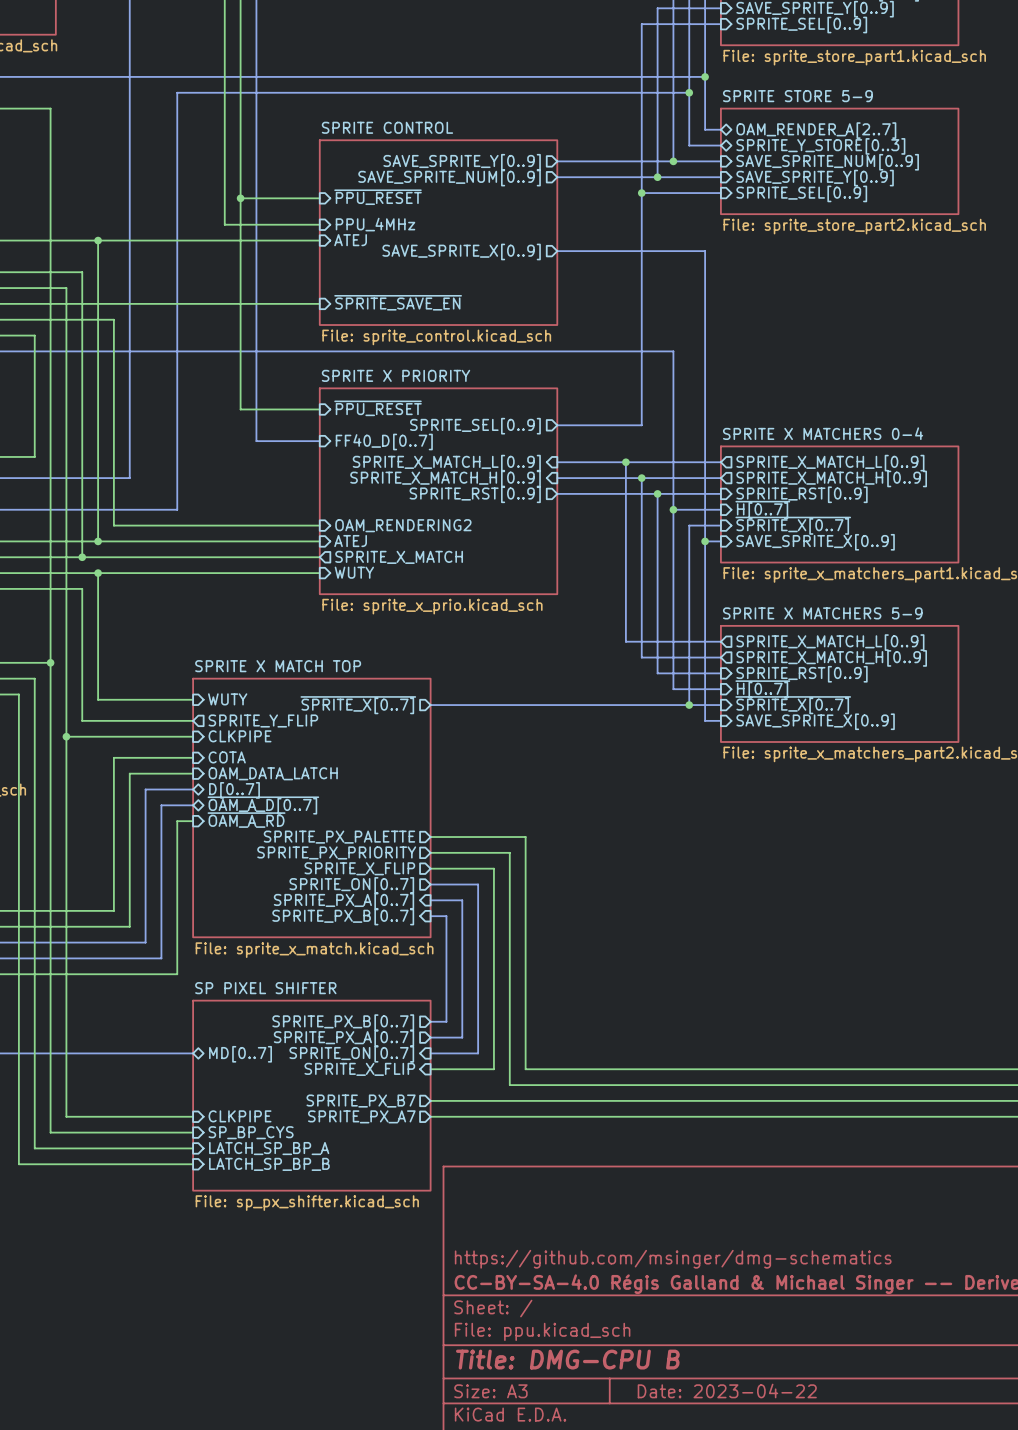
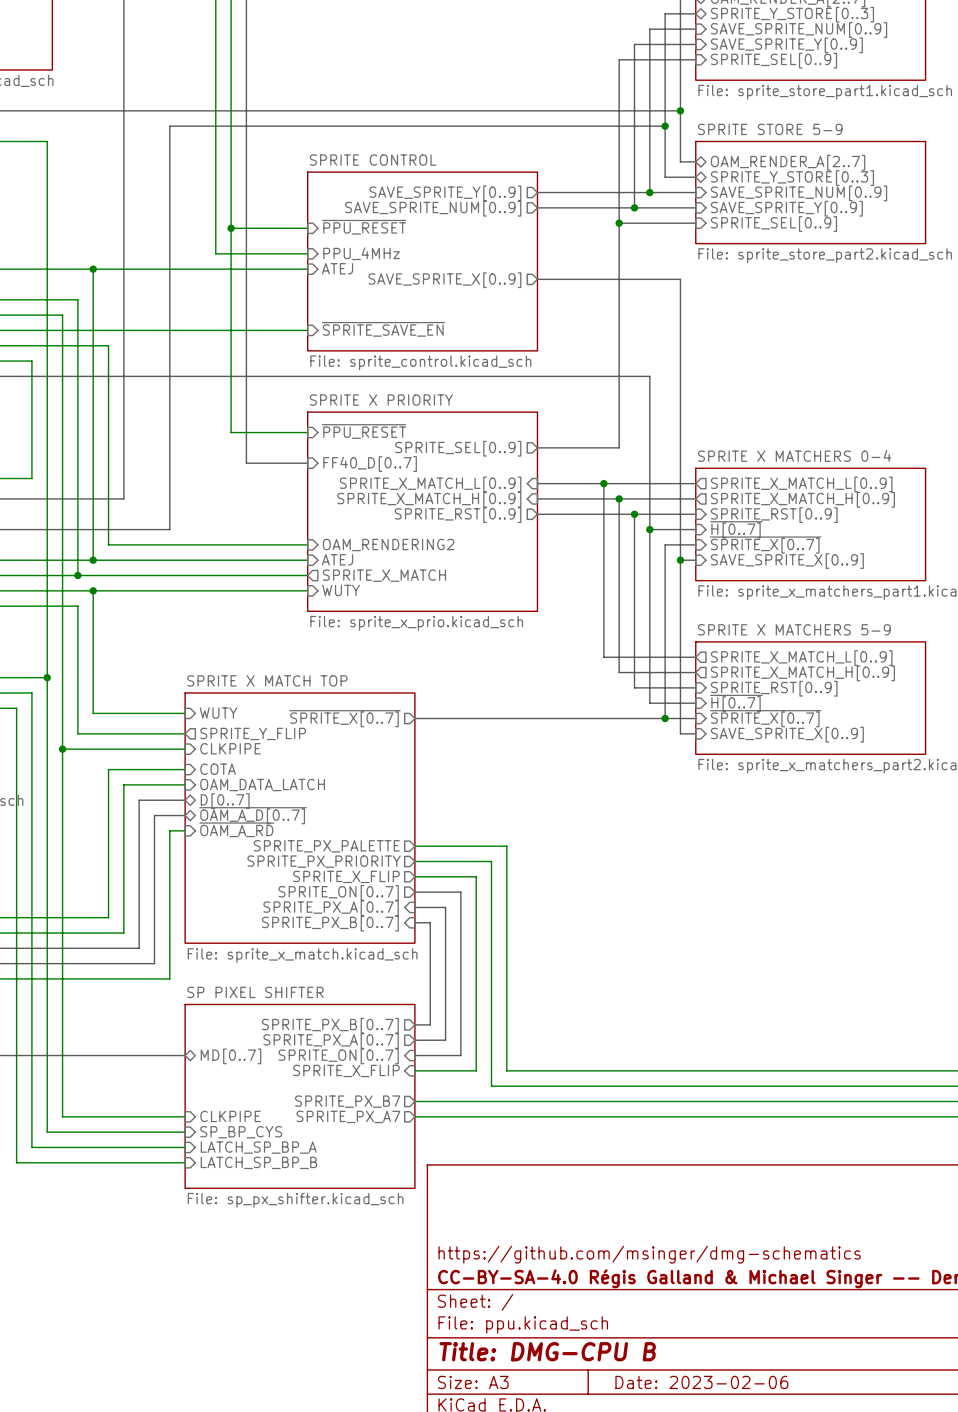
title block: Date: 2023-04-22 (727, 1391) -> Date: 2023-02-06 (701, 1382)

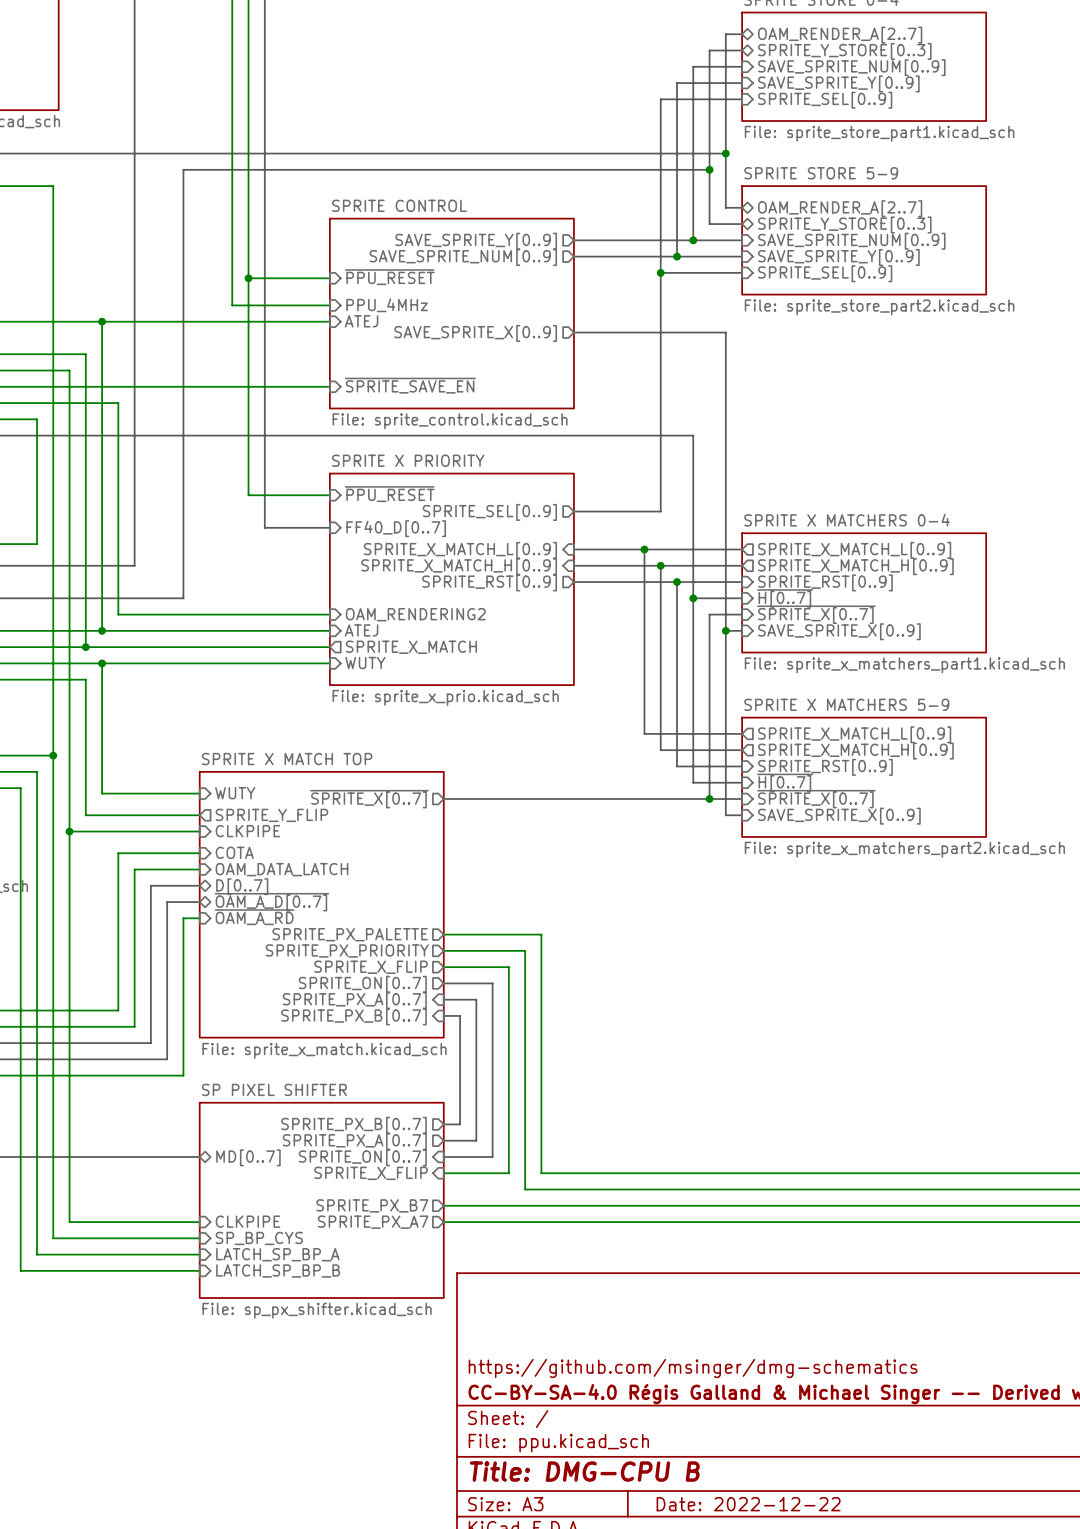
title block: Date: 2023-02-06 (701, 1382) -> Date: 2022-12-22 (748, 1504)

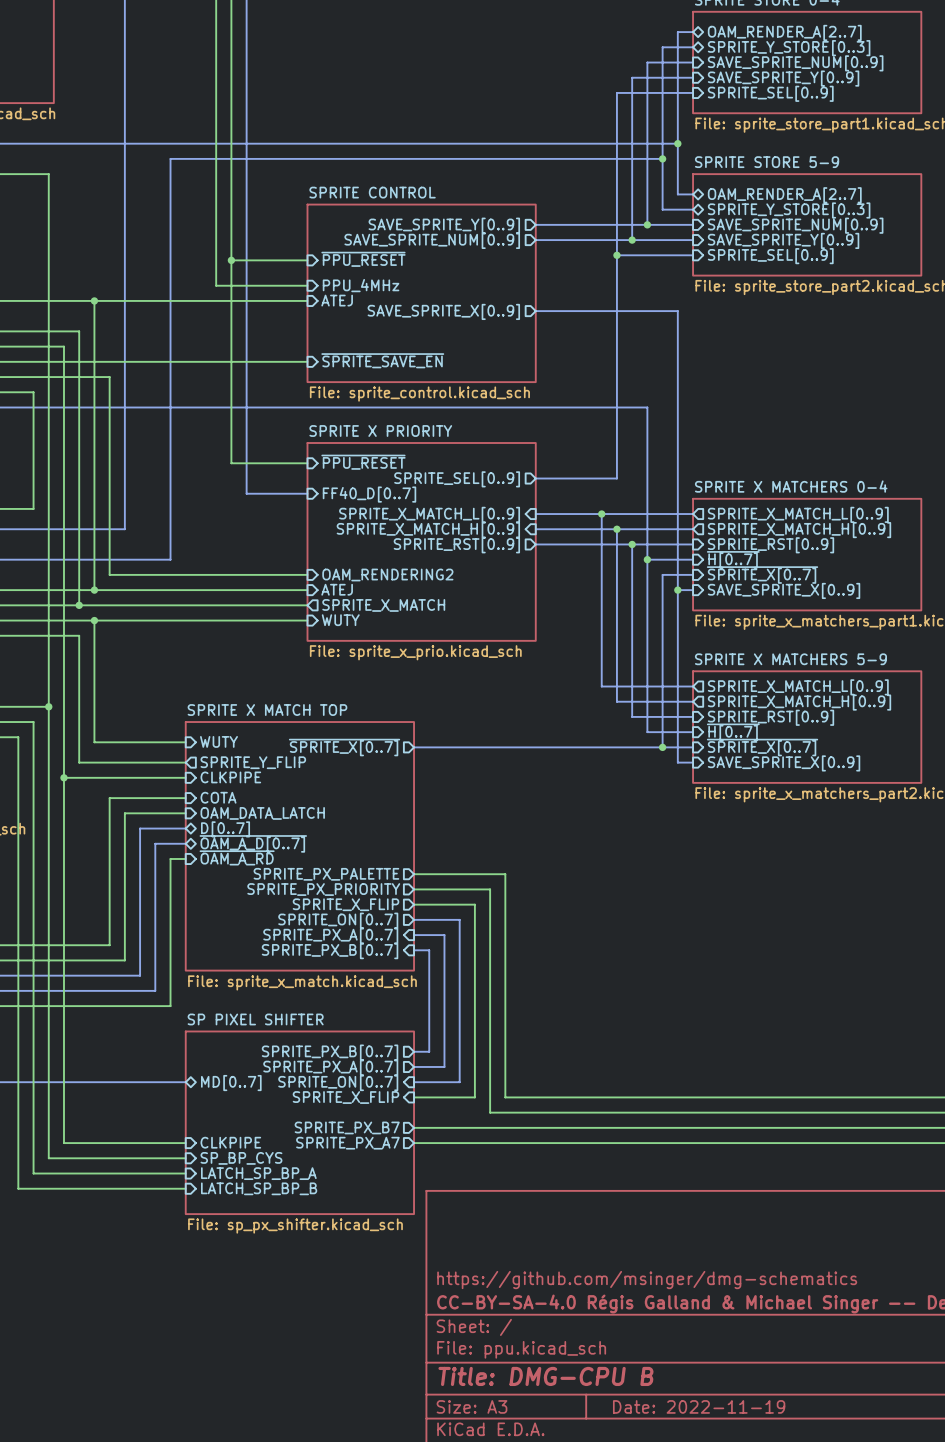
title block: Date: 2022-12-22 (748, 1504) -> Date: 2022-11-19 (699, 1406)

